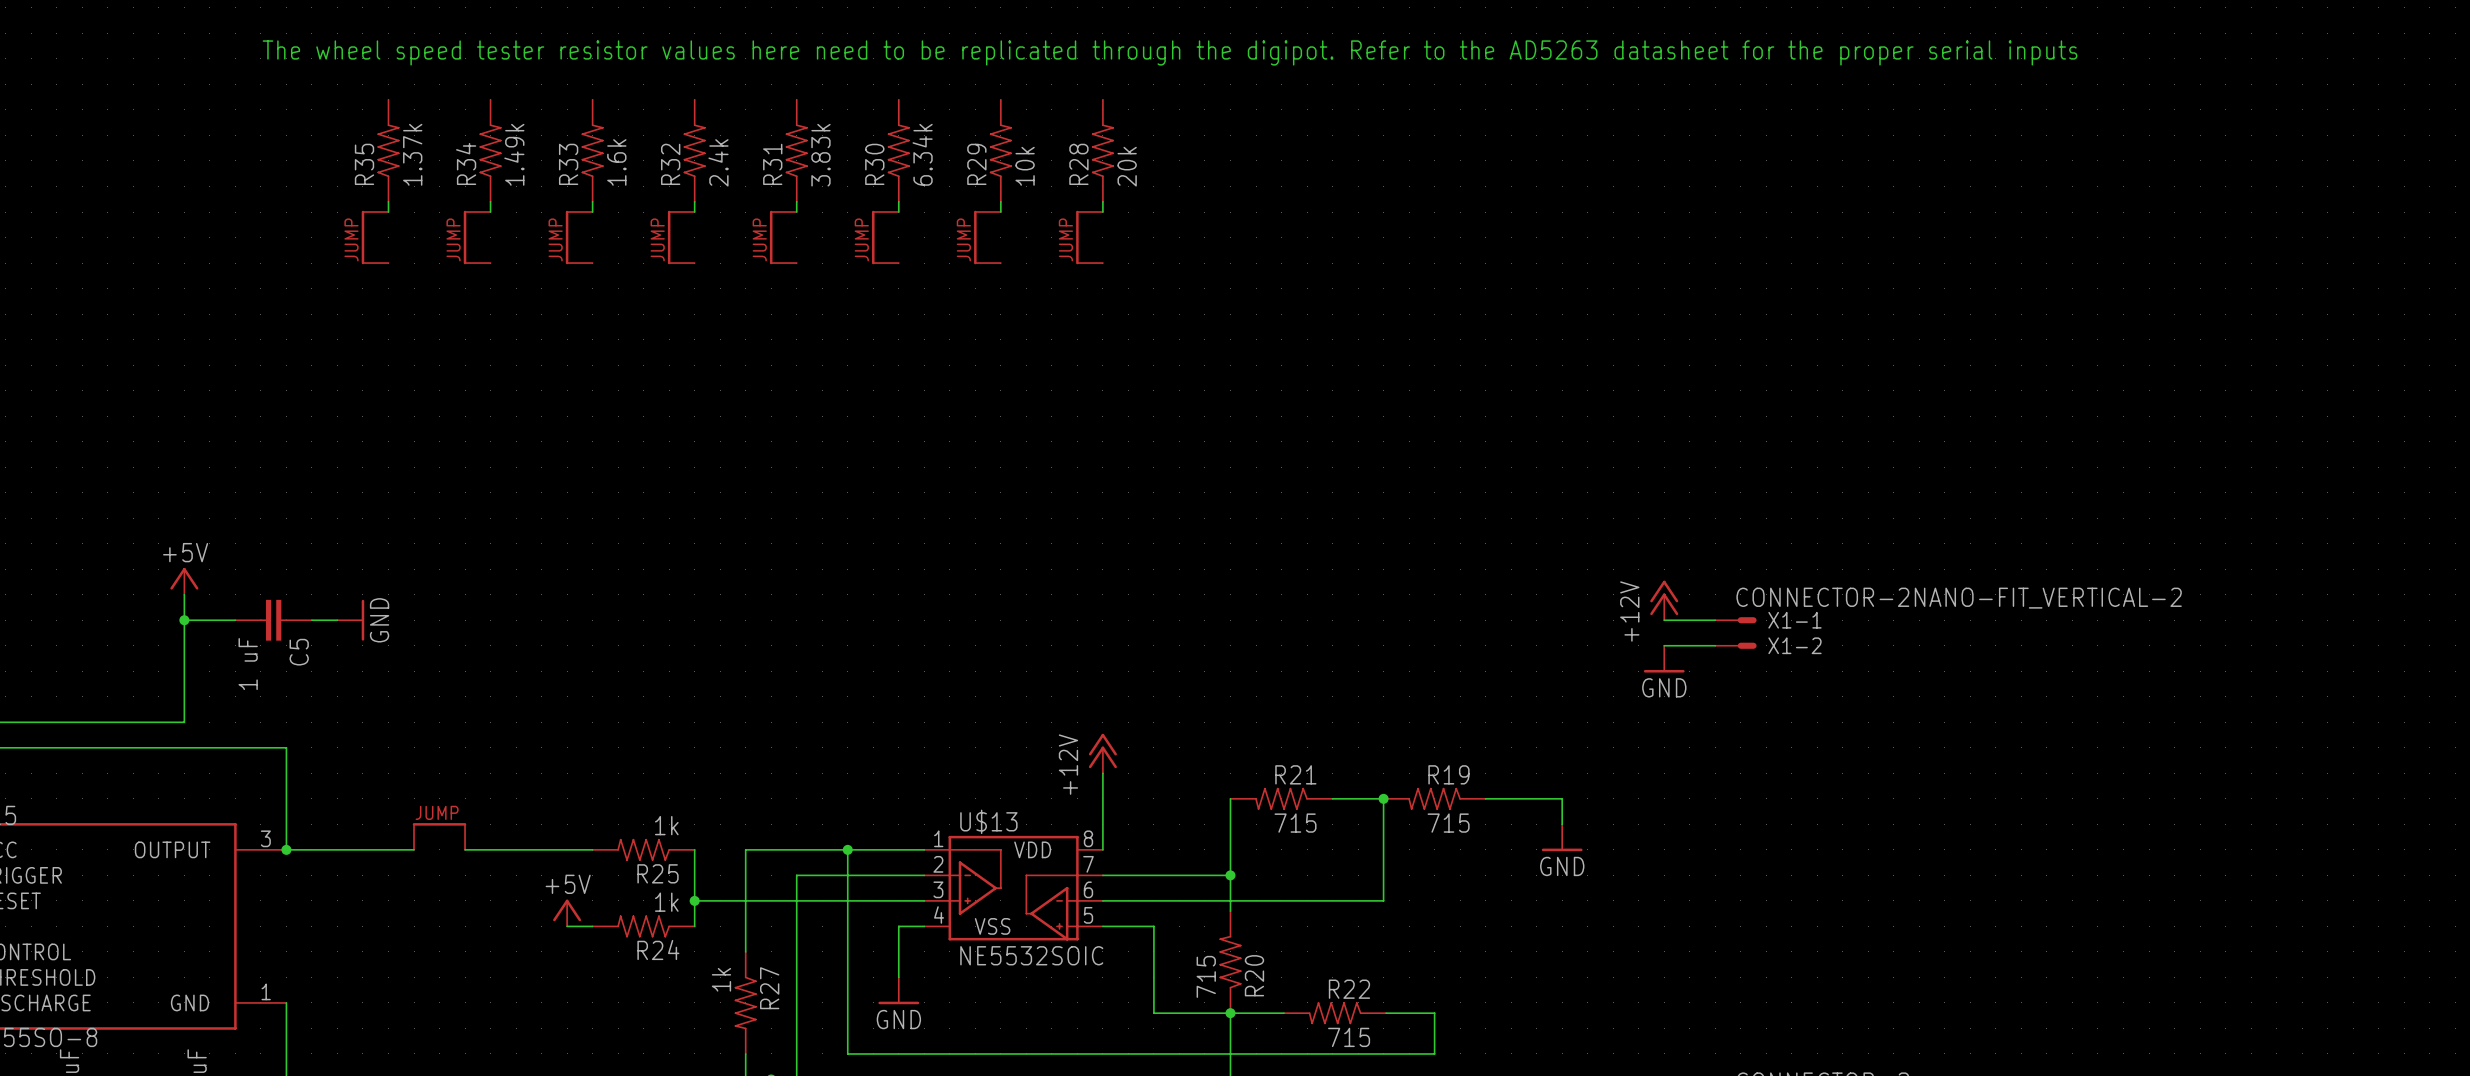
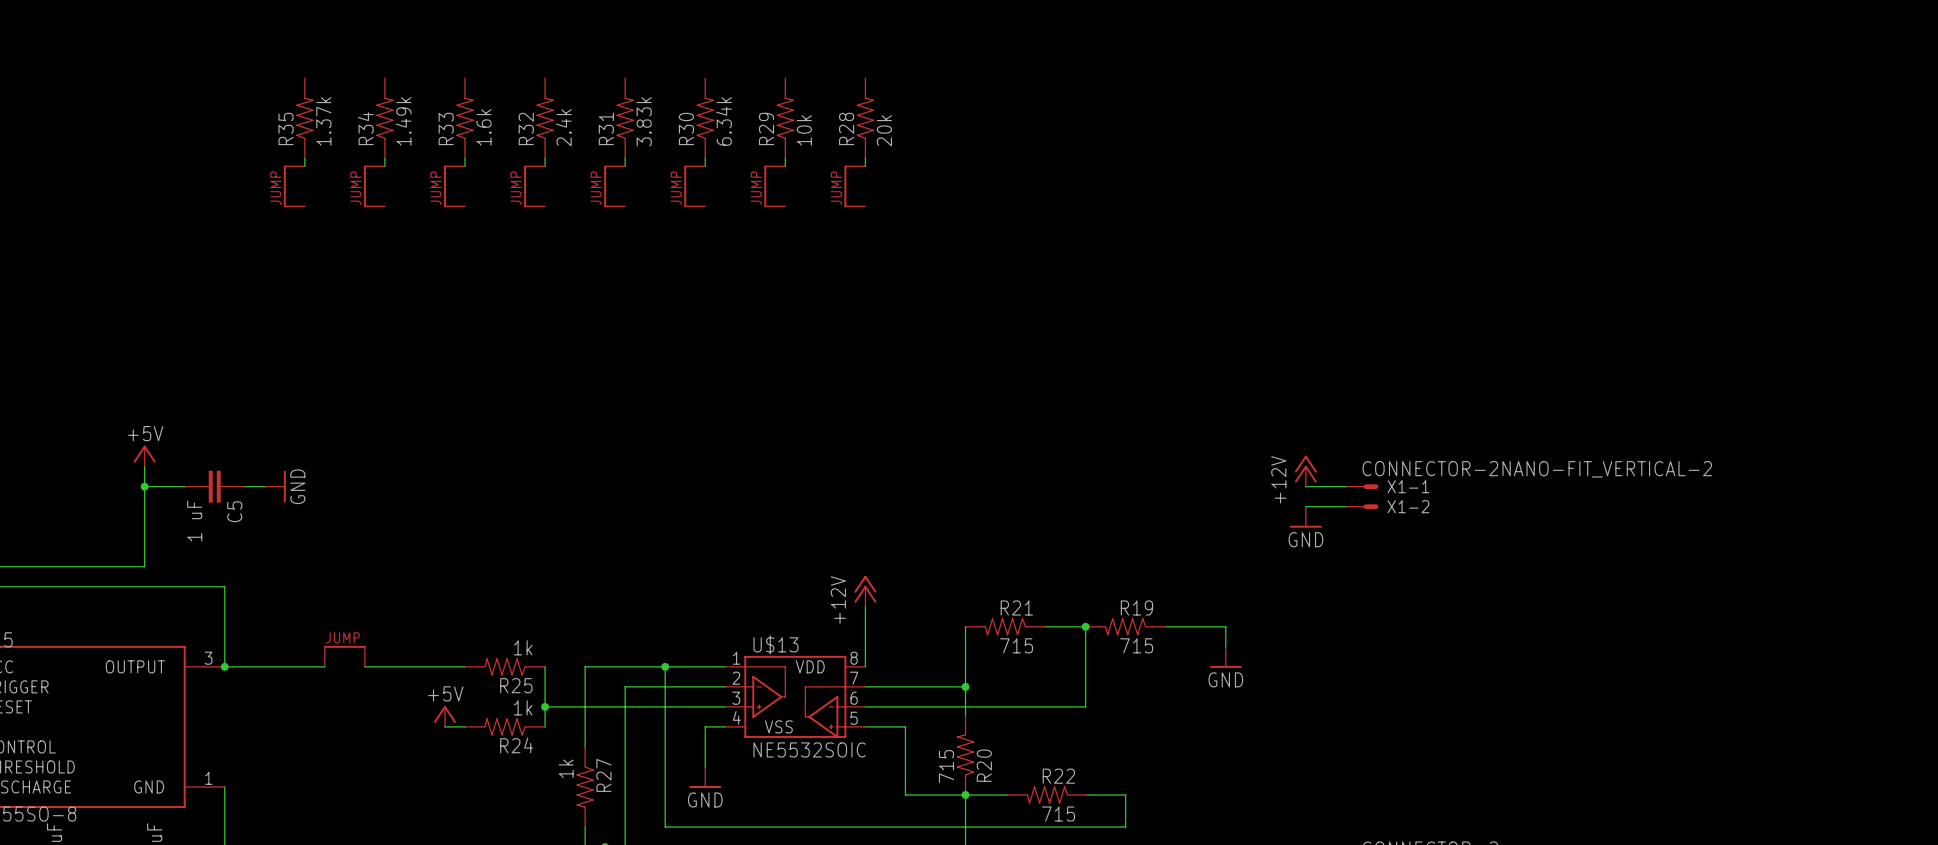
text: The wheel speed tester resistor values here need to be replicated through the digipot. Refer to the AD5263 datasheet for the proper serial inputs (1170, 52) -> none

